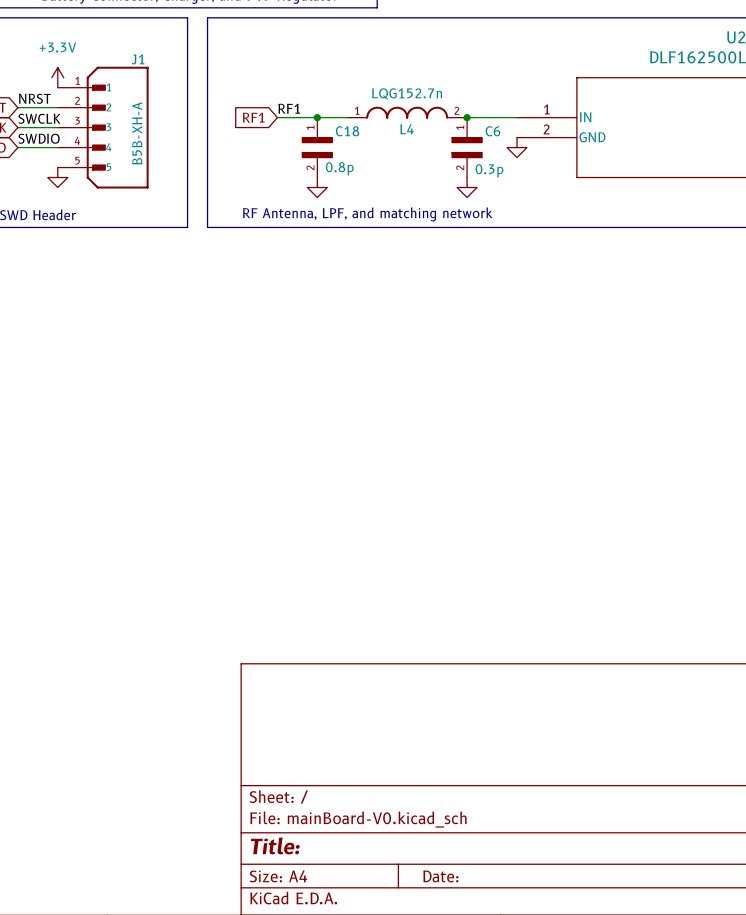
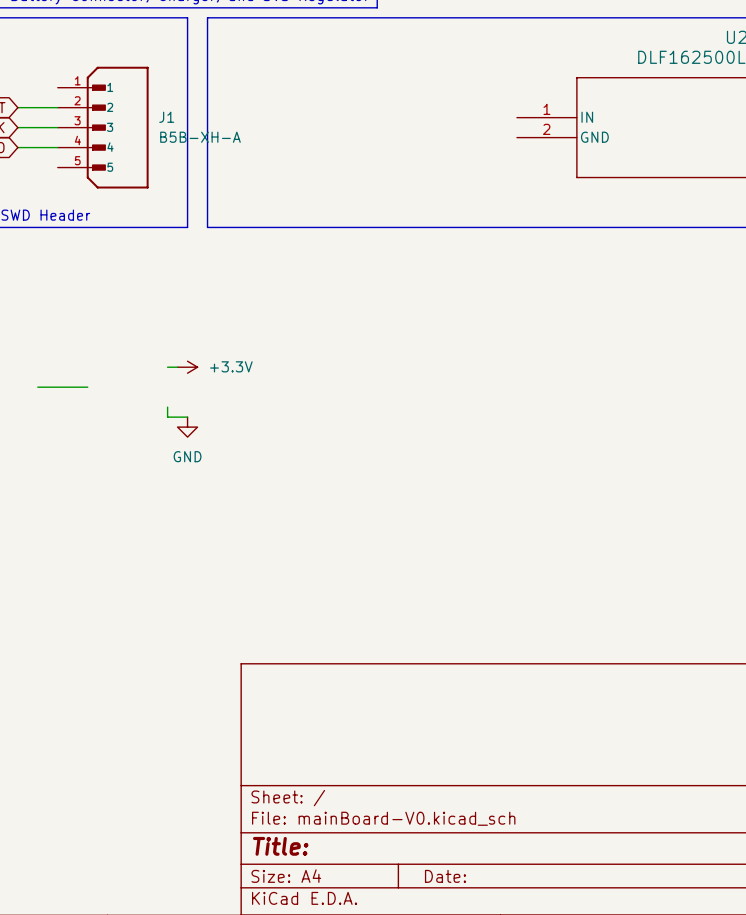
J1 name position: J1 (138, 59) -> J1 (166, 117)
power symbol: +3.3V (57, 77) -> none
label: NRST (34, 98) -> none
label: RF1 (289, 108) -> none
L4: LQG152.7n (407, 112) -> none
global label: RF1 (253, 117) -> none
wire: (277, 117) (347, 117) -> none
junction: (317, 117) -> none
wire: (467, 117) (516, 117) -> none
junction: (467, 117) -> none
label: SWCLK (39, 118) -> none
J1 value rotation: 0° (137, 133) -> 90° clockwise (200, 137)
label: SWDIO (39, 138) -> none
C18: 0.8p (317, 147) -> none
C6: 0.3p (467, 147) -> none
power symbol: (516, 147) -> none
power symbol: (57, 177) -> none
power symbol: (317, 187) -> none
power symbol: (467, 187) -> none
text: RF Antenna, LPF, and matching network (367, 214) -> none
wire: none -> (167, 367) (177, 367)
power symbol: none -> +3.3V (187, 367)
wire: none -> (37, 387) (87, 387)
wire: none -> (167, 407) (167, 417) (187, 417)
power symbol: none -> GND (187, 427)

